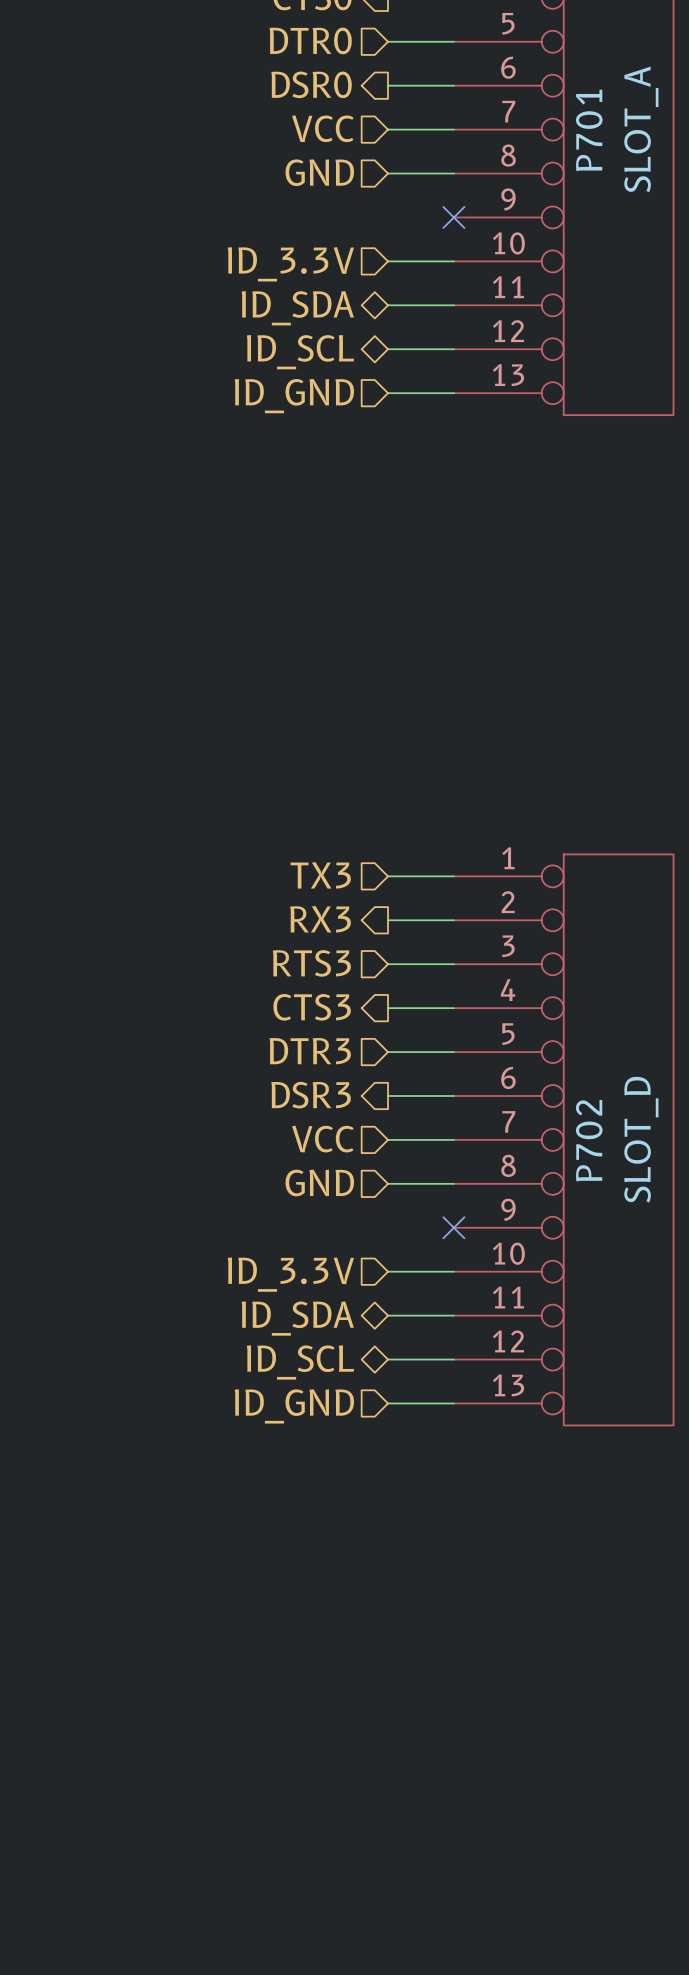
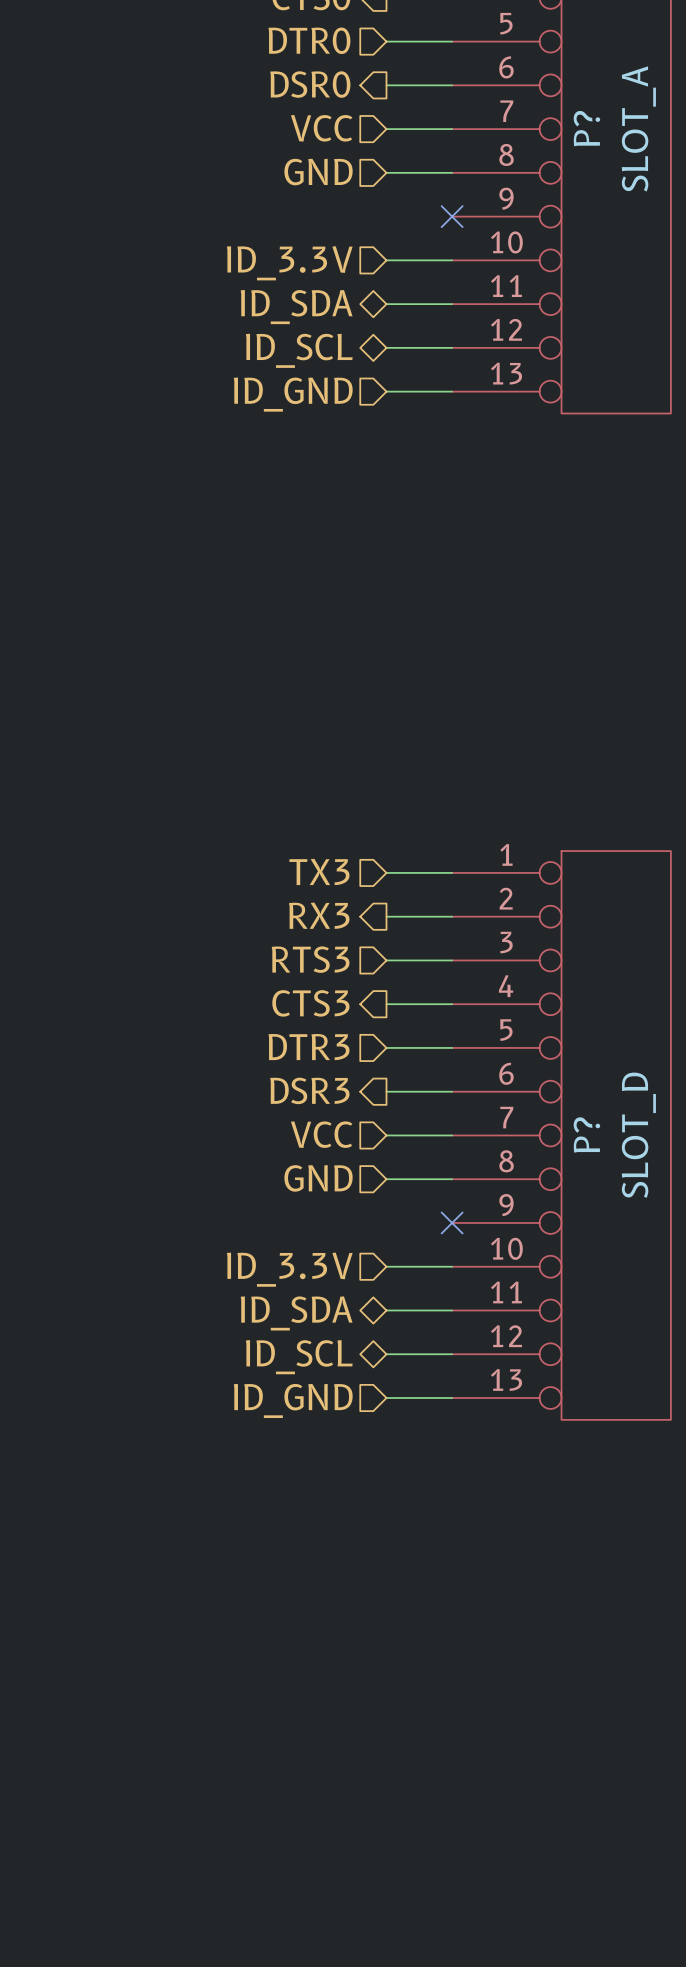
P701 name: P701 (589, 130) -> P? (586, 128)
P702 name: P702 (589, 1140) -> P? (586, 1134)

